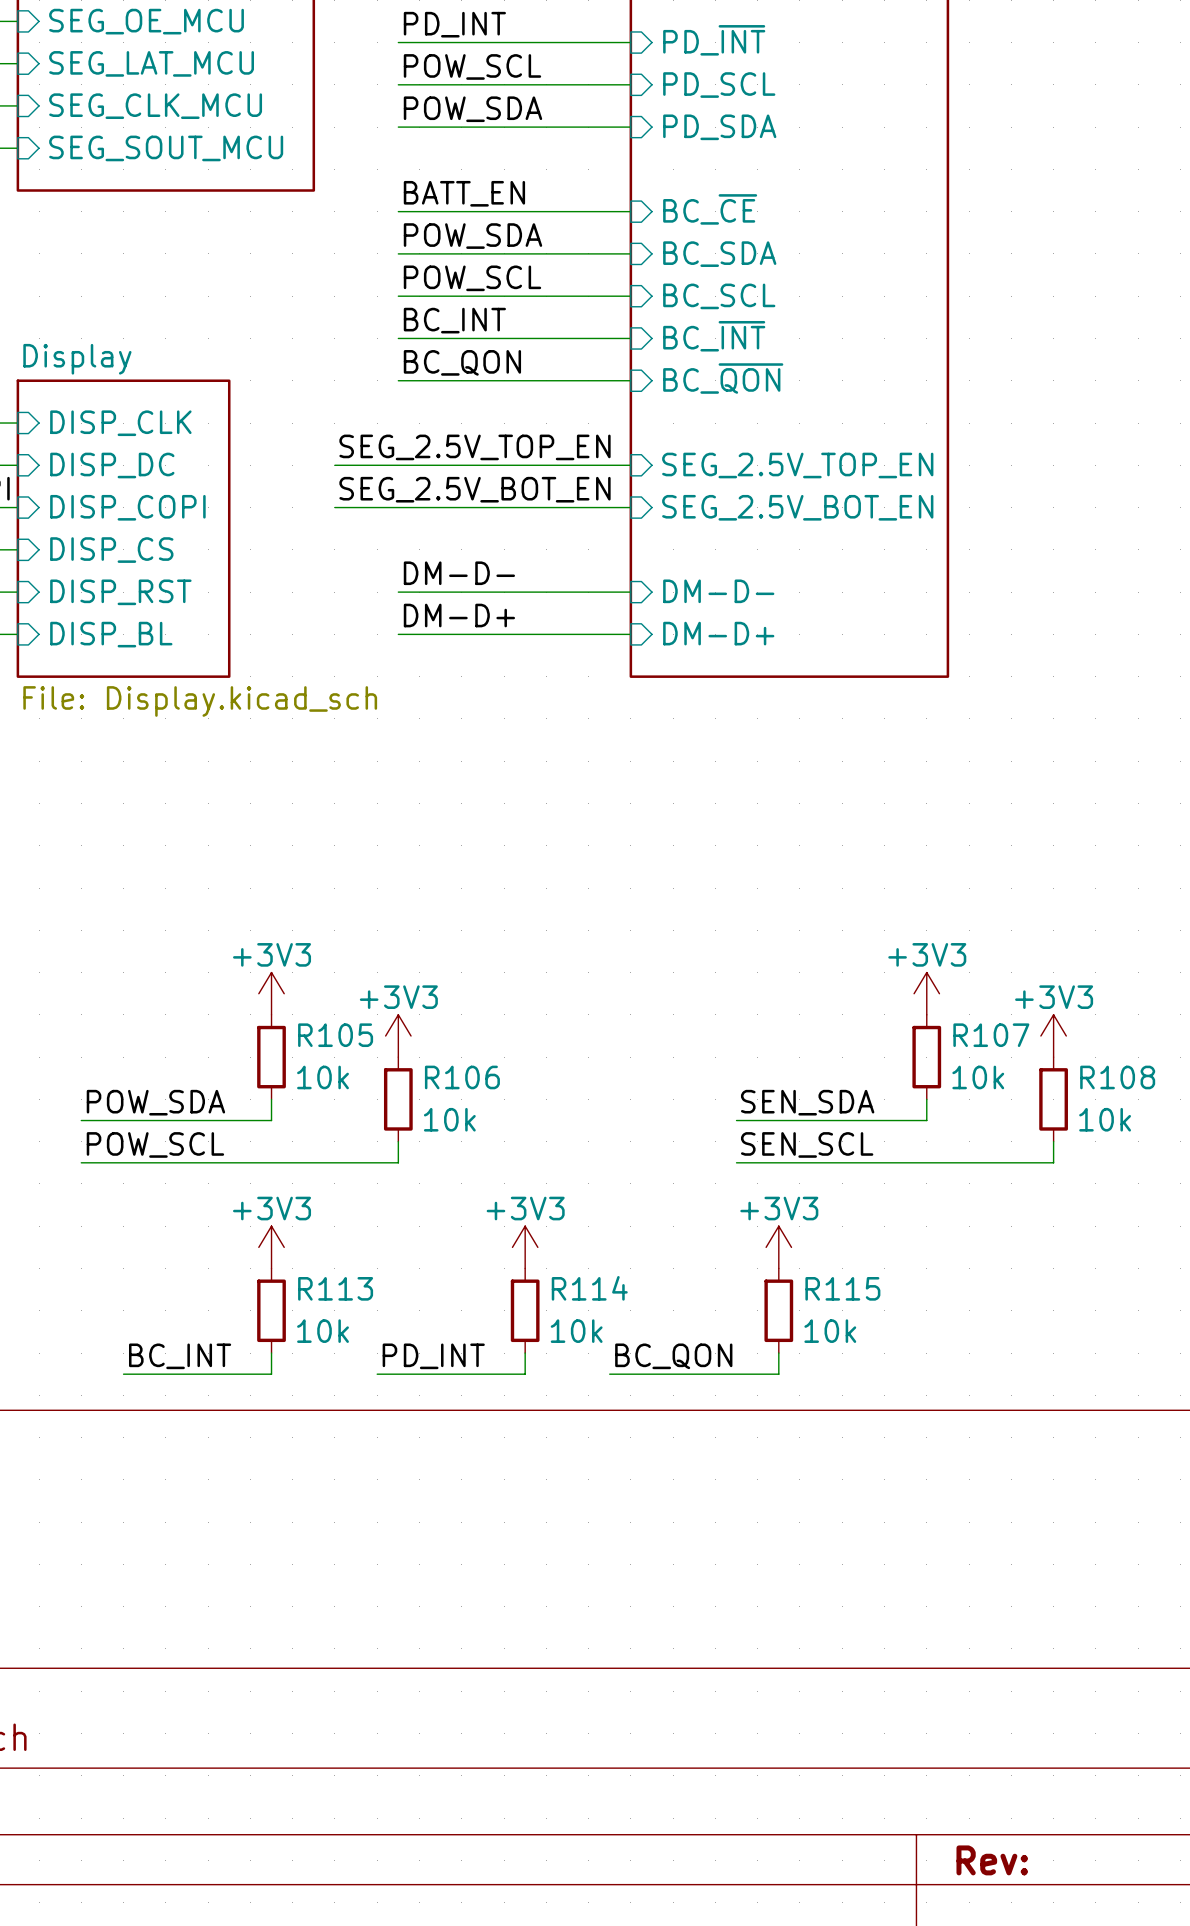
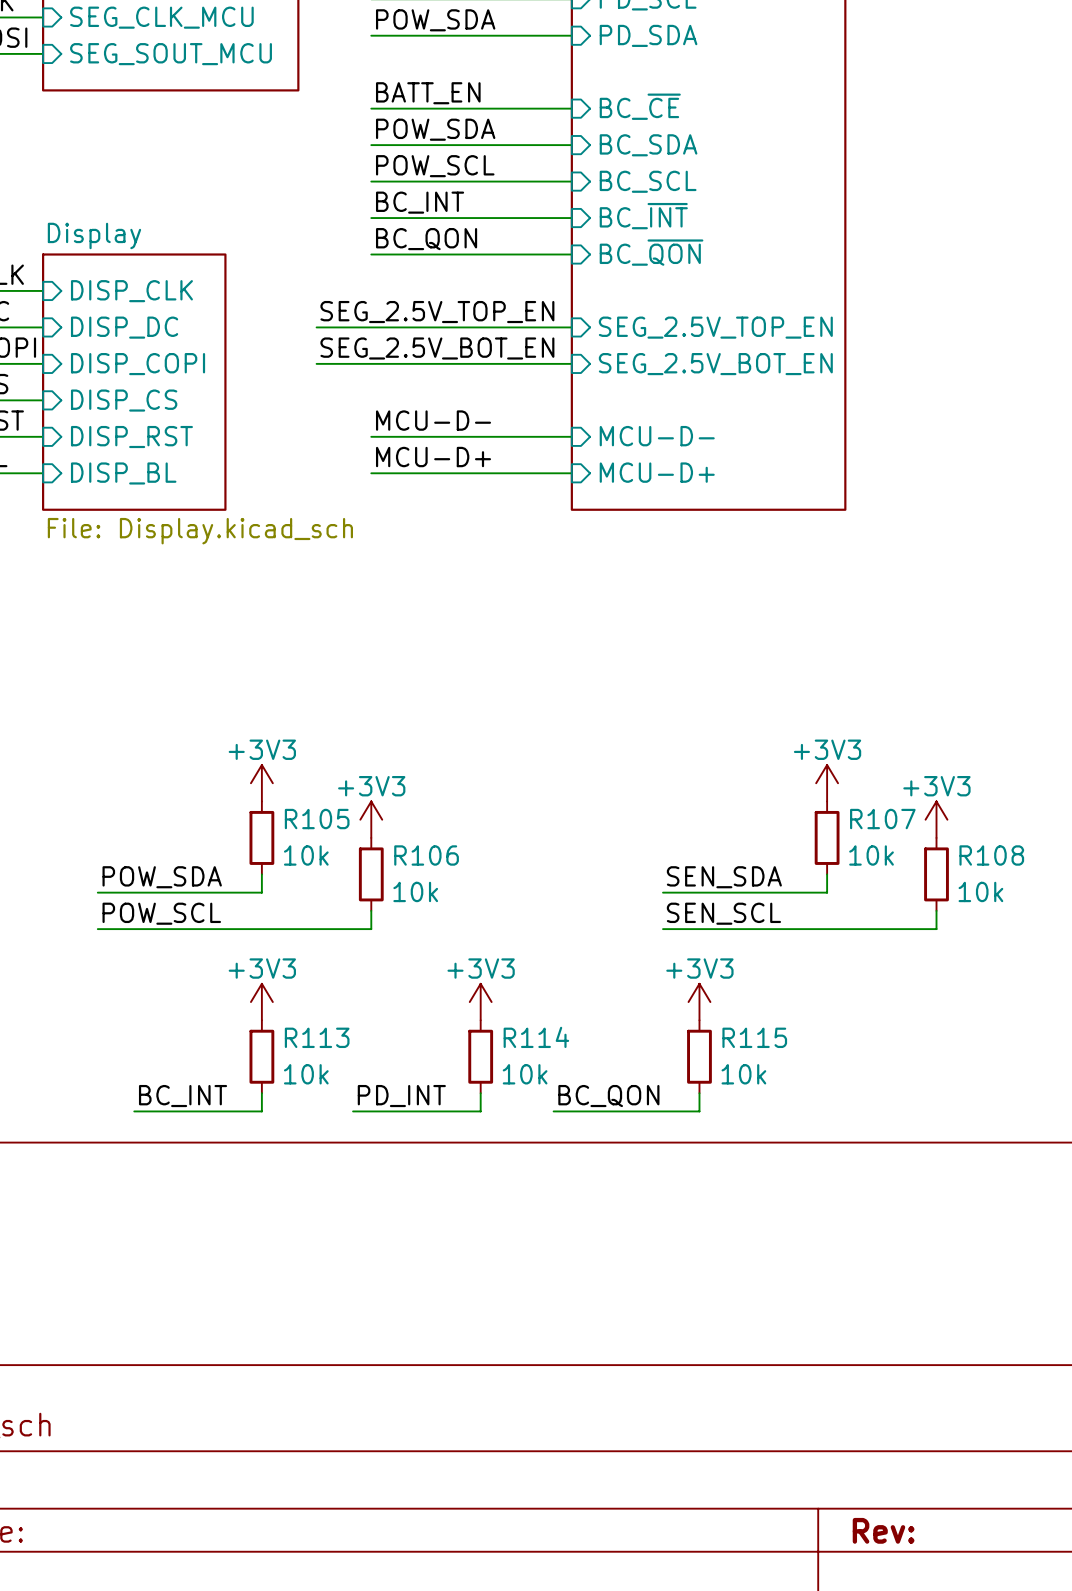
label: DM-D- (459, 573) -> MCU-D- (433, 420)
sheet pin: DM-D- (718, 591) -> MCU-D- (657, 436)
label: DM-D+ (459, 615) -> MCU-D+ (433, 457)
sheet pin: DM-D+ (718, 633) -> MCU-D+ (657, 472)

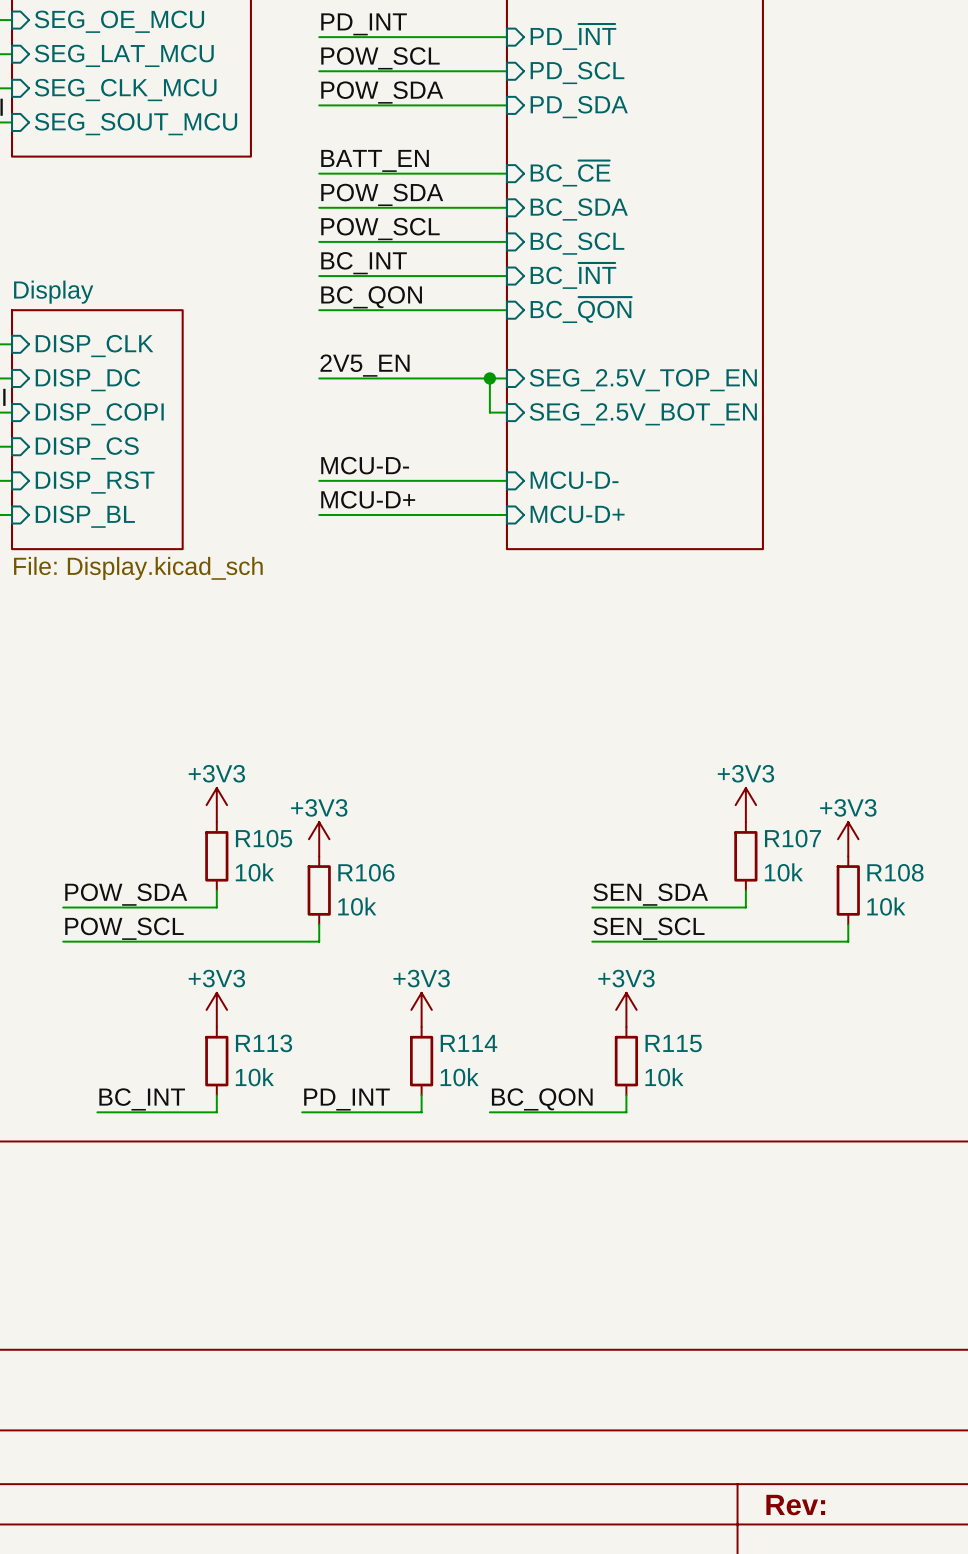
label: none -> 2V5_EN (365, 365)
label: SEG_2.5V_TOP_EN (437, 312) -> none
wire: (316, 327) (371, 327) -> none
junction: none -> (489, 378)
label: SEG_2.5V_BOT_EN (437, 348) -> none
wire: (316, 363) (553, 363) -> (489, 378) (489, 412)

